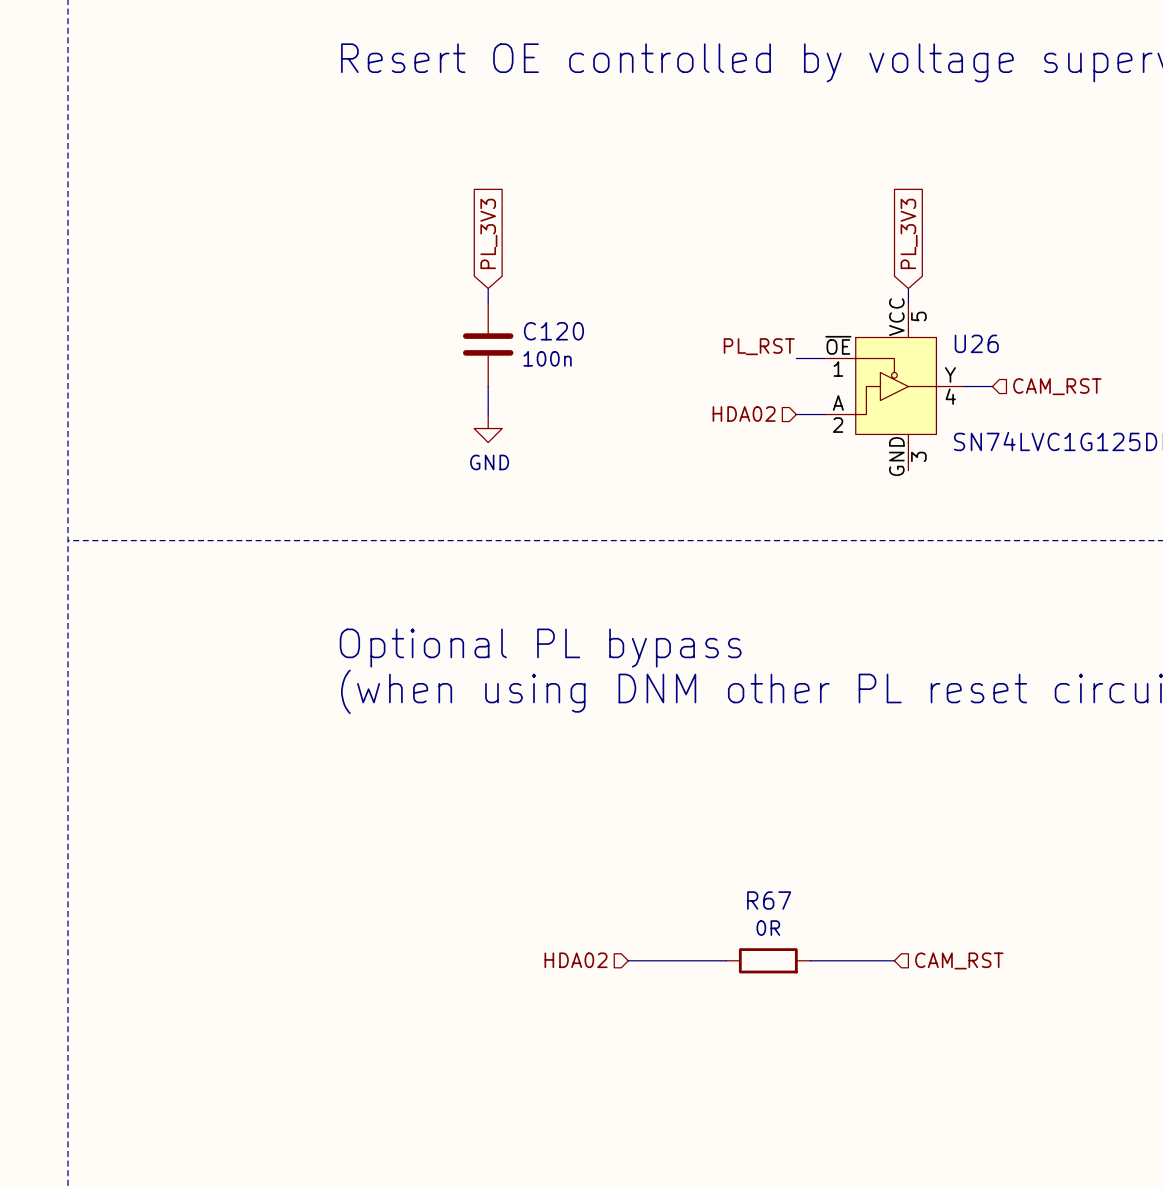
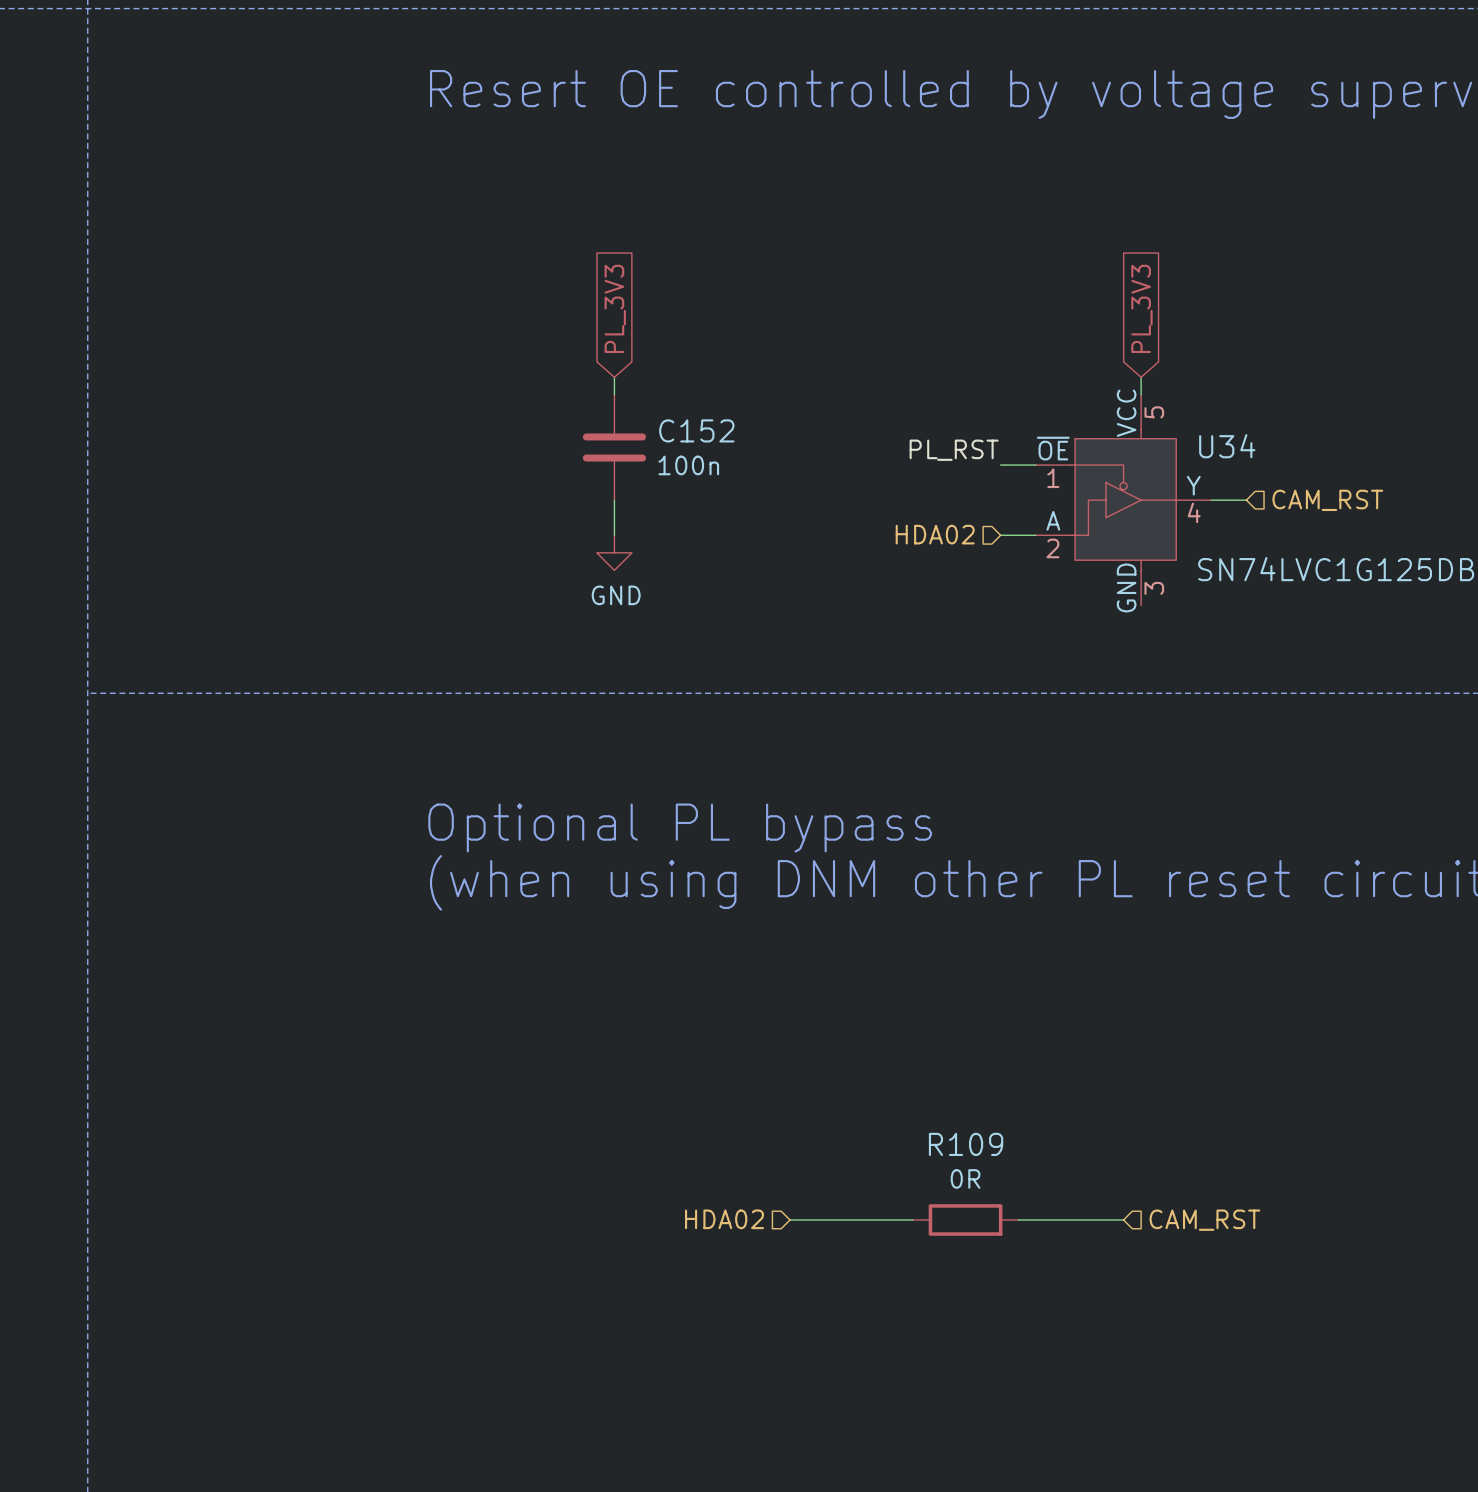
C120 name: C120 (553, 331) -> C152 (696, 430)
U26 name: U26 (976, 343) -> U34 (1227, 446)
R67 name: R67 (769, 900) -> R109 (966, 1144)

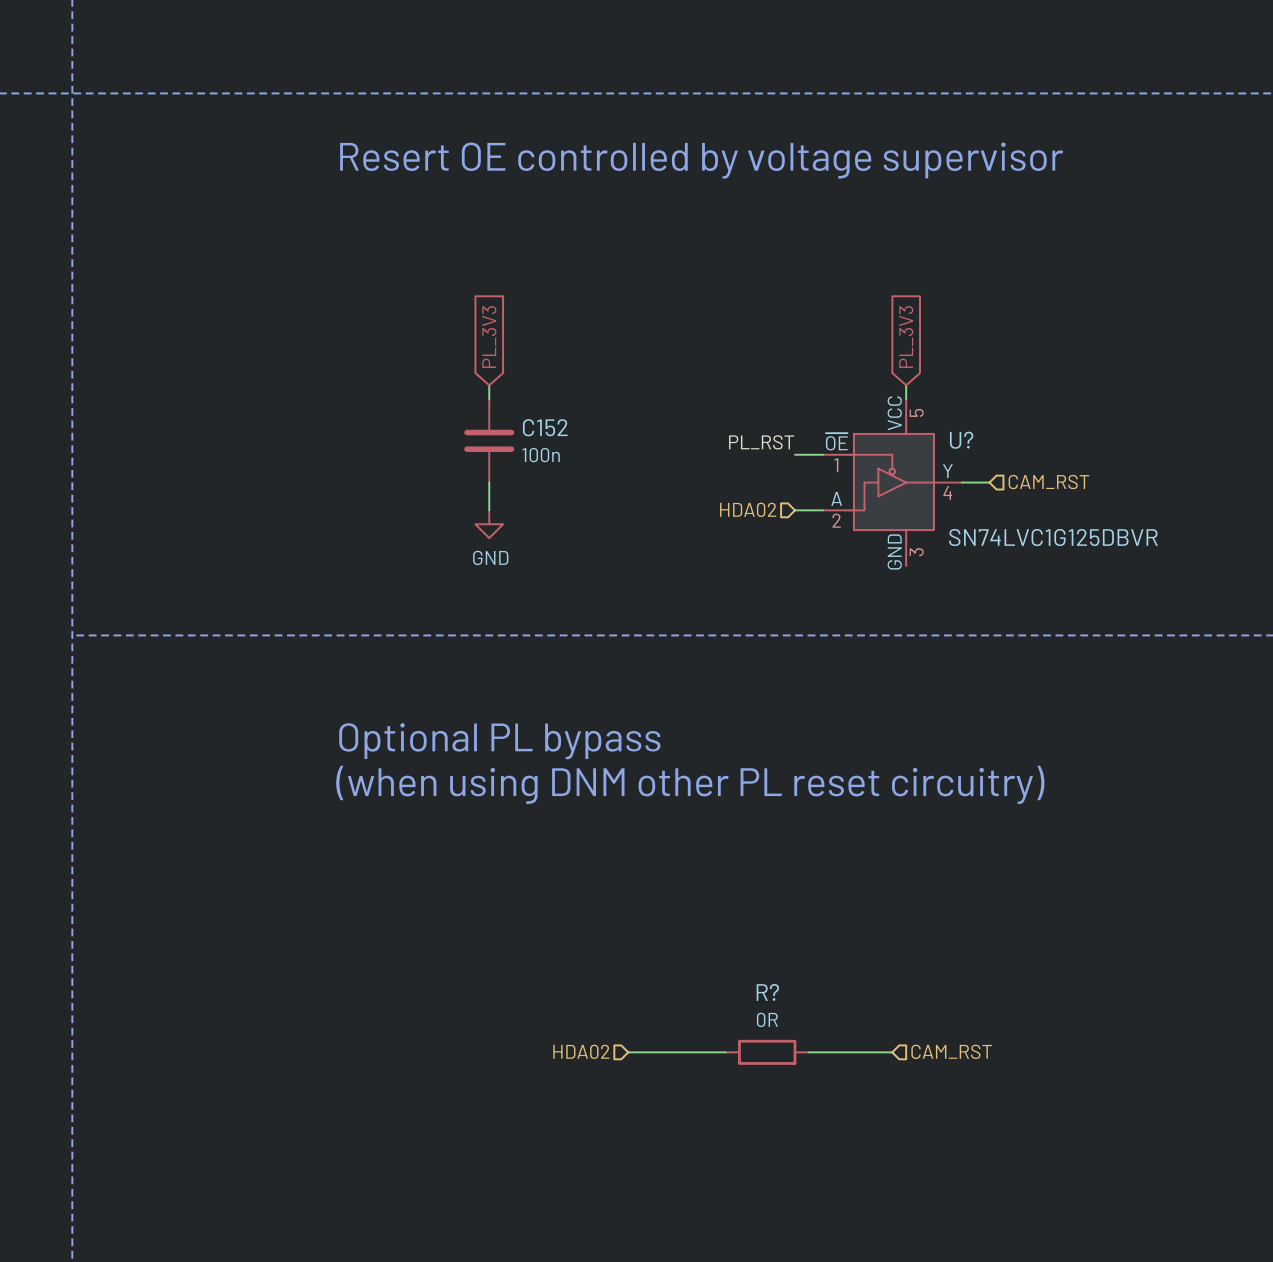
U34 name: U34 (1227, 446) -> U? (961, 440)
R109 name: R109 (966, 1144) -> R? (767, 992)

